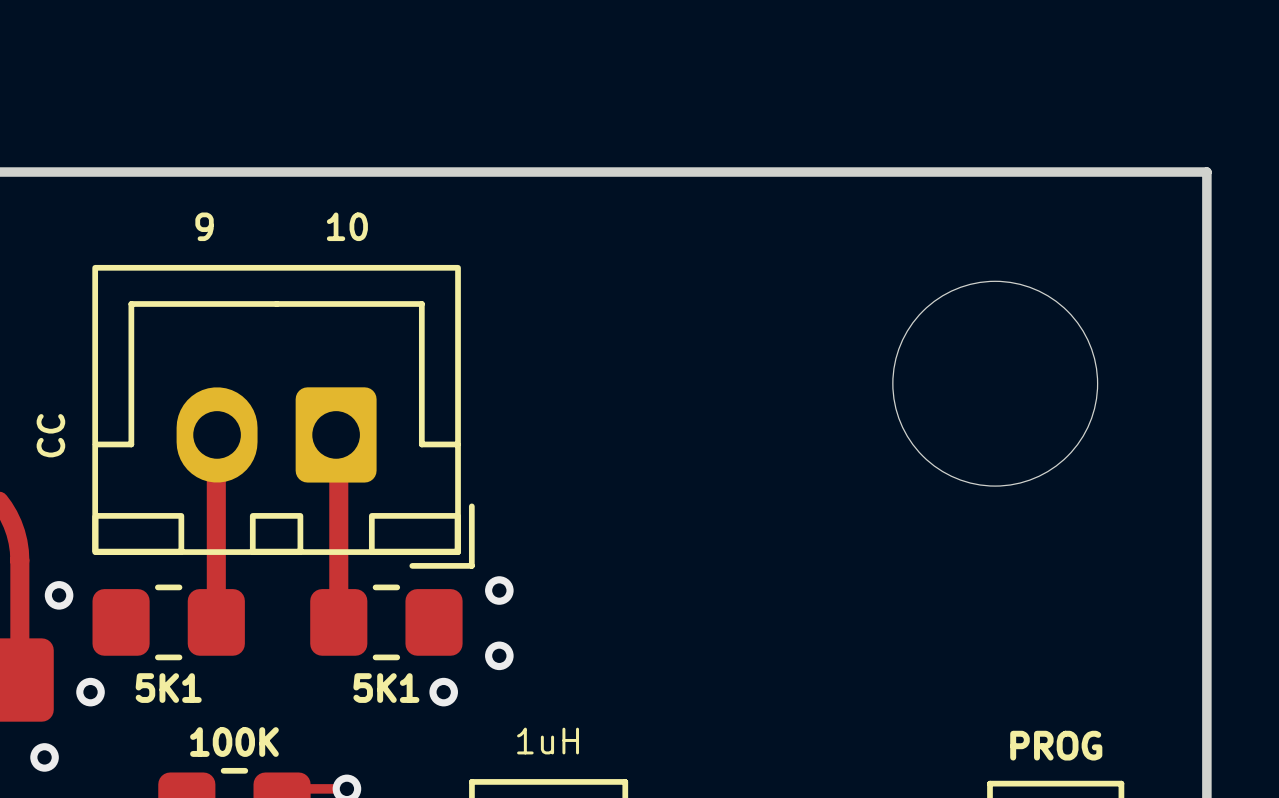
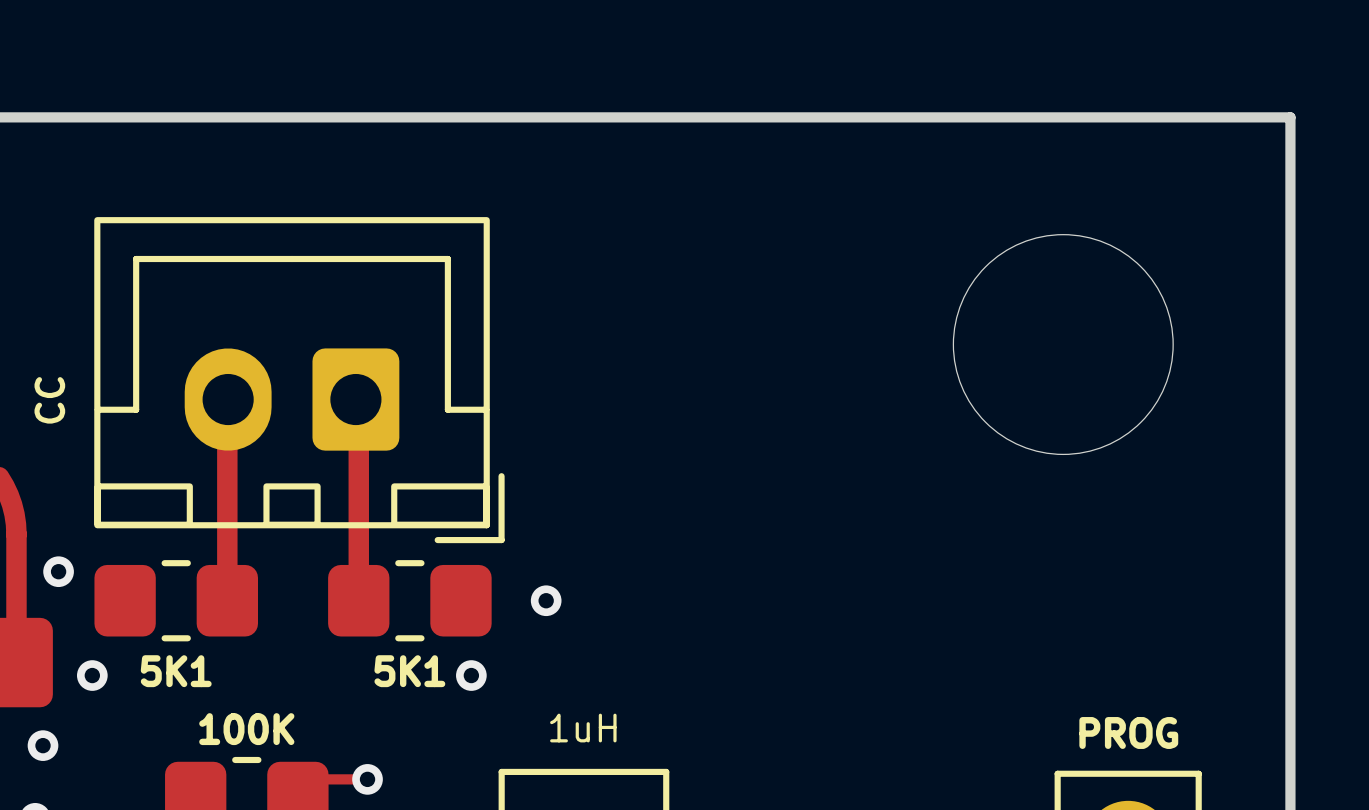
text: 9 10 (281, 226) -> none
via: (499, 590) -> none
via: none -> (546, 600)
via: (499, 655) -> none

